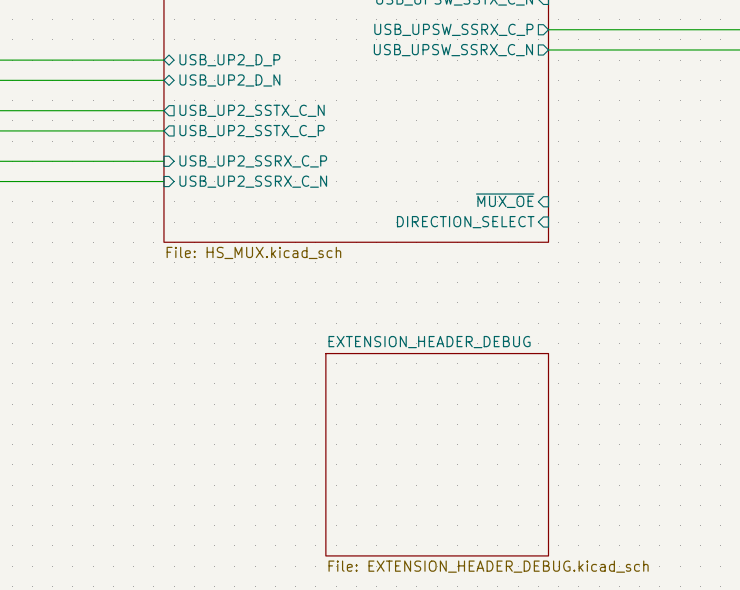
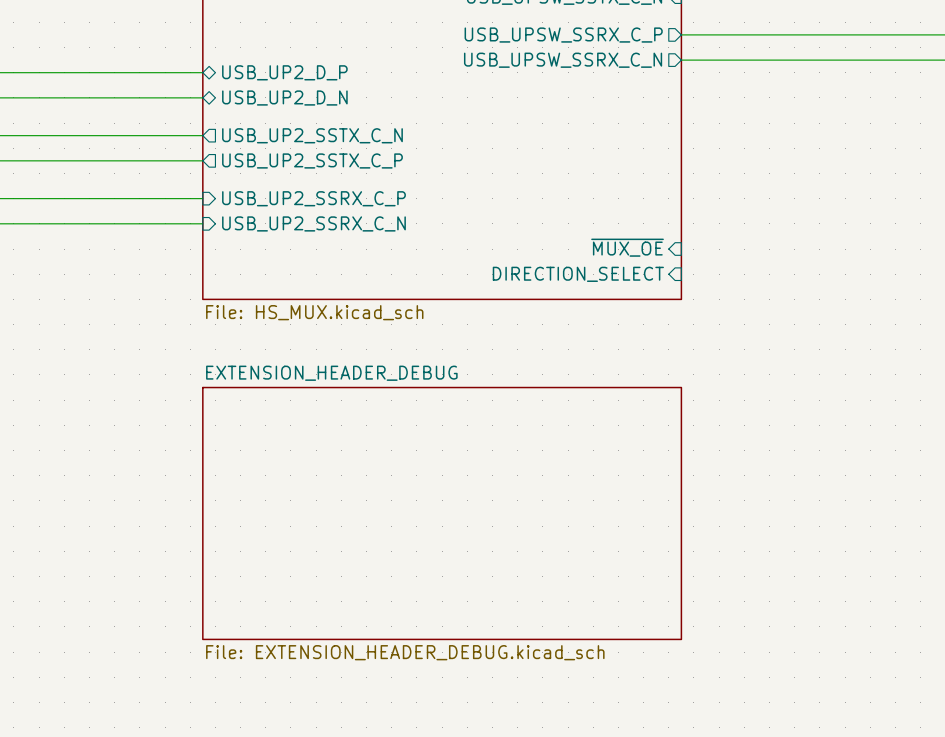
sheet EXTENSION_HEADER_DEBUG: none -> File: EXTENSION_HEADER_DEBUG.kicad_sch (442, 513)
sheet EXTENSION_HEADER_DEBUG: File: EXTENSION_HEADER_DEBUG.kicad_sch (437, 454) -> none

